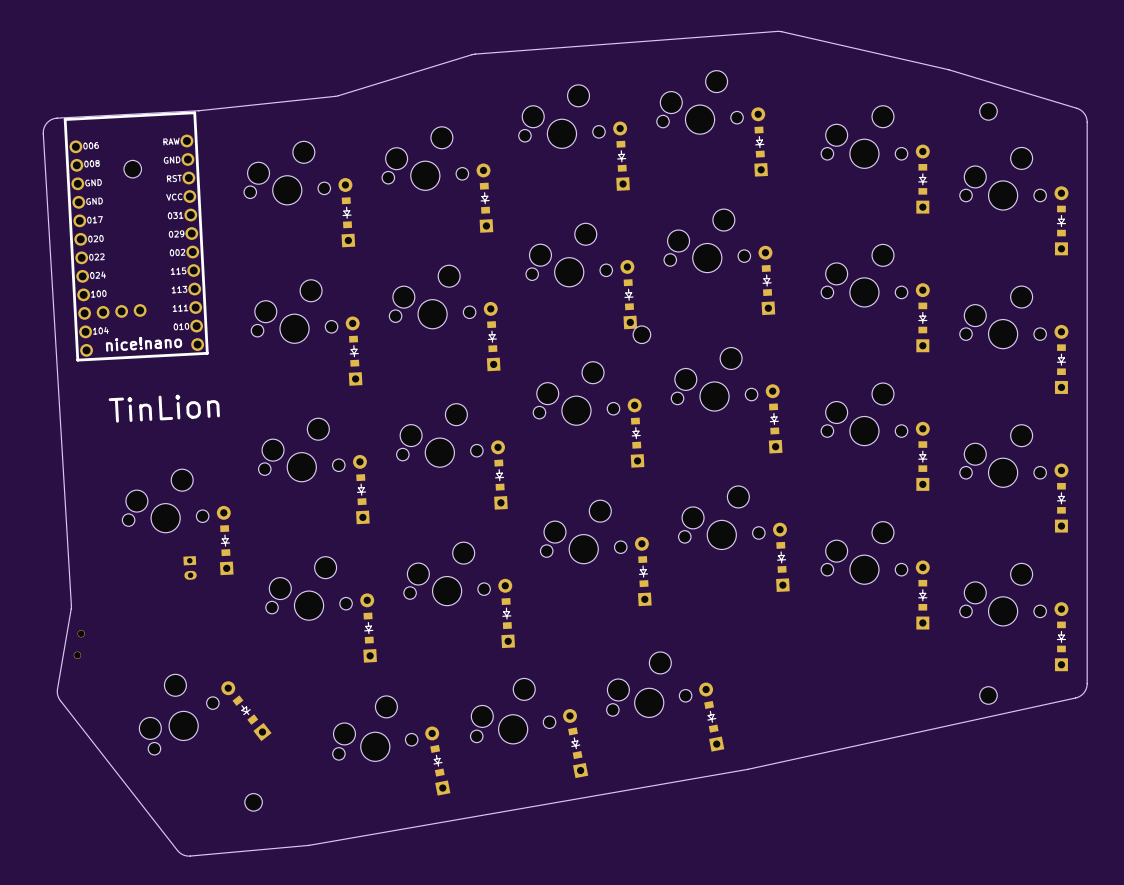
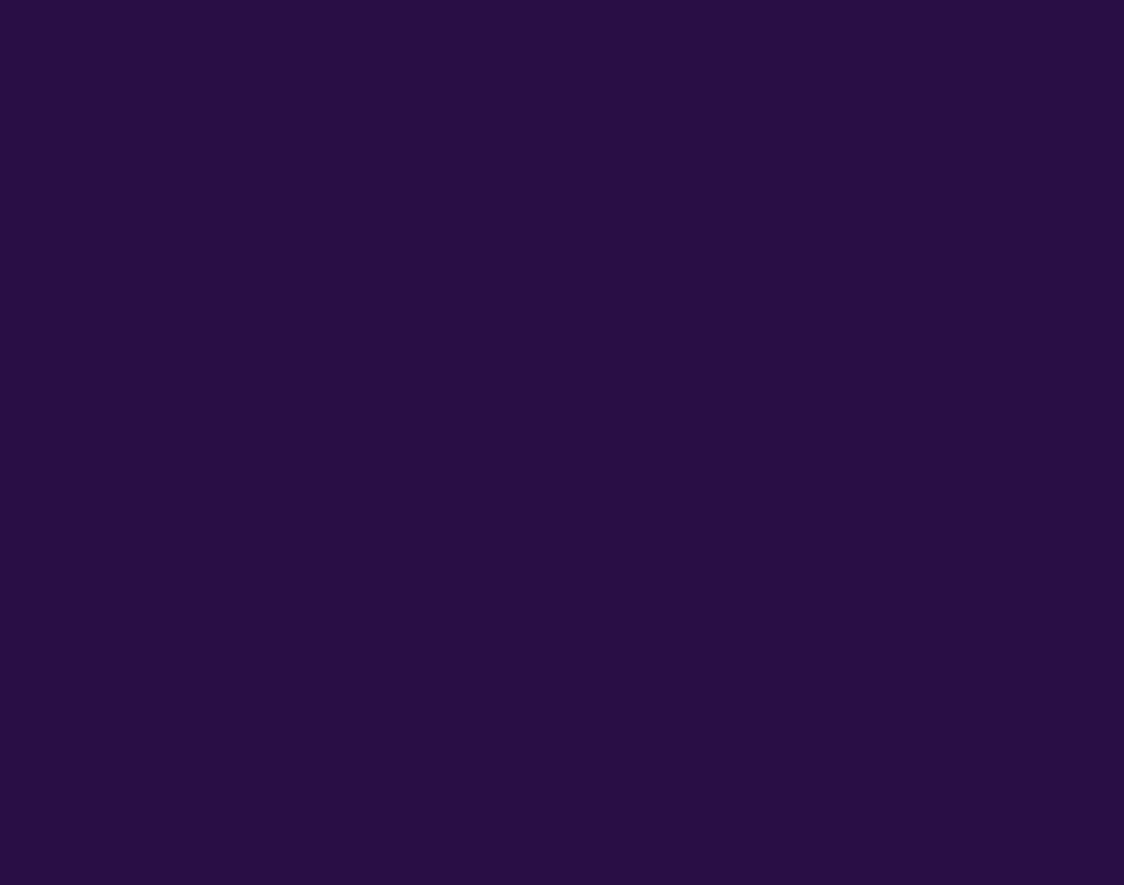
board edge: (777, 31) (475, 54) (336, 96) (198, 110) (57, 118) (45, 124) (43, 133) (71, 605) (57, 693) (60, 700) (180, 853) (190, 856) (308, 845) (747, 769) (1075, 697) (1083, 692) (1087, 683) (1086, 116) (1076, 108) (948, 69) (777, 31) -> none
part: (700, 102) -> none
part: (988, 111) -> none
part: (561, 116) -> none
part: (864, 137) -> none
part: (759, 141) -> none
part: (621, 156) -> none
part: (425, 158) -> none
part: (132, 169) -> none
part: (287, 173) -> none
part: (1003, 178) -> none
part: (922, 179) -> none
part: (484, 198) -> none
part: (346, 212) -> none
part: (1061, 220) -> none
part: (136, 236) -> none
part: (707, 240) -> none
part: (569, 255) -> none
part: (864, 275) -> none
part: (766, 280) -> none
part: (628, 294) -> none
part: (432, 297) -> none
part: (294, 311) -> none
part: (922, 317) -> none
part: (1003, 317) -> none
part: (641, 334) -> none
part: (492, 336) -> none
part: (354, 351) -> none
part: (1061, 359) -> none
part: (714, 379) -> none
part: (576, 393) -> none
text: TinLion (164, 408) -> none
part: (864, 414) -> none
part: (774, 418) -> none
part: (636, 433) -> none
part: (439, 435) -> none
part: (301, 450) -> none
part: (922, 456) -> none
part: (1003, 456) -> none
part: (499, 475) -> none
part: (361, 489) -> none
part: (1061, 498) -> none
part: (165, 500) -> none
part: (721, 517) -> none
part: (583, 531) -> none
part: (225, 540) -> none
part: (864, 552) -> none
part: (781, 557) -> none
part: (190, 567) -> none
part: (643, 571) -> none
part: (447, 573) -> none
part: (309, 588) -> none
part: (922, 594) -> none
part: (1003, 594) -> none
part: (506, 613) -> none
part: (368, 628) -> none
part: (1061, 636) -> none
part: (79, 644) -> none
part: (649, 684) -> none
part: (988, 695) -> none
part: (246, 711) -> none
part: (513, 711) -> none
part: (179, 714) -> none
part: (711, 717) -> none
part: (375, 728) -> none
part: (575, 743) -> none
part: (437, 761) -> none
part: (253, 802) -> none

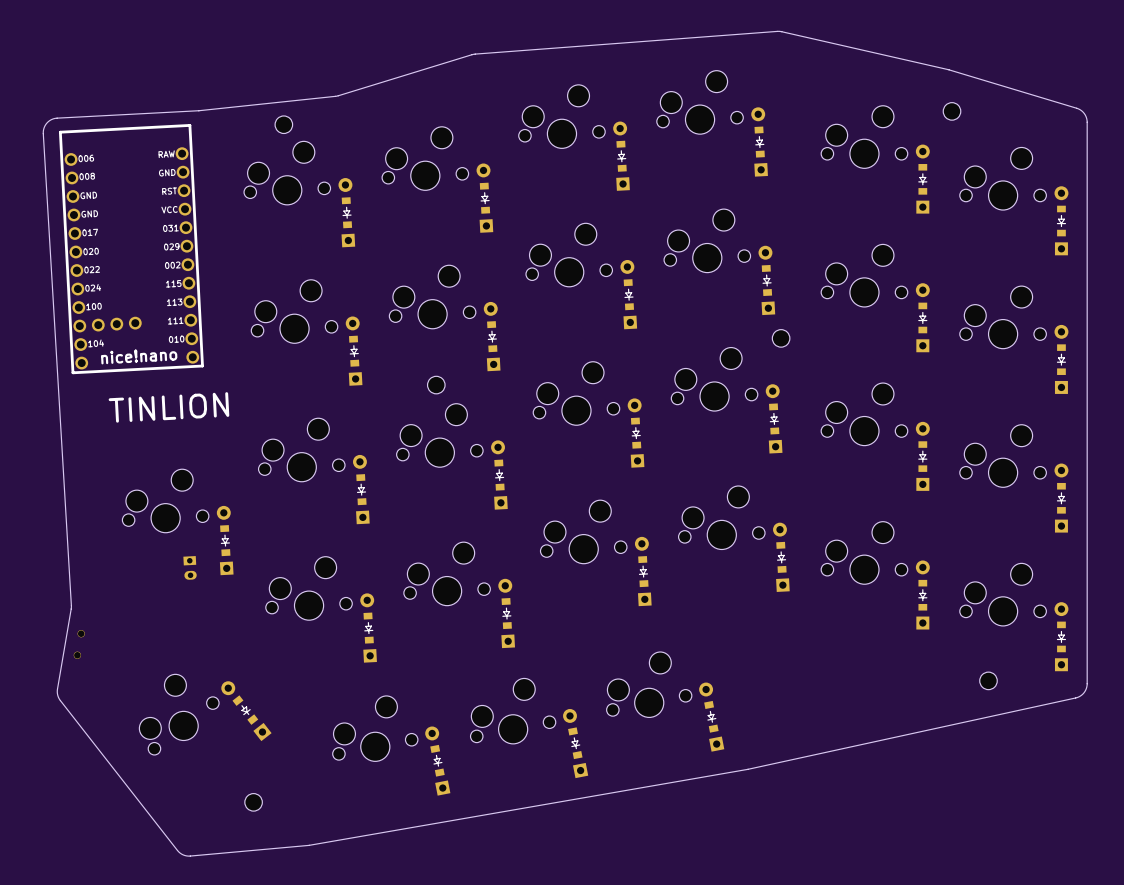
board edge: none -> (777, 31) (475, 54) (336, 96) (198, 110) (57, 118) (45, 124) (43, 133) (71, 605) (57, 693) (60, 700) (180, 853) (190, 856) (308, 845) (747, 769) (1075, 697) (1083, 692) (1087, 683) (1086, 116) (1076, 108) (948, 69) (777, 31)
part: none -> (700, 102)
part: none -> (952, 111)
part: none -> (561, 116)
part: none -> (283, 124)
part: none -> (864, 137)
part: none -> (759, 141)
part: none -> (621, 156)
part: none -> (425, 158)
part: none -> (287, 173)
part: none -> (1003, 178)
part: none -> (922, 179)
part: none -> (484, 198)
part: none -> (346, 212)
part: none -> (1061, 220)
part: none -> (707, 240)
part: none -> (131, 249)
part: none -> (569, 255)
part: none -> (864, 275)
part: none -> (766, 280)
part: none -> (628, 294)
part: none -> (432, 297)
part: none -> (294, 311)
part: none -> (922, 317)
part: none -> (1003, 317)
part: none -> (492, 336)
part: none -> (781, 338)
part: none -> (354, 351)
part: none -> (1061, 359)
part: none -> (714, 379)
part: none -> (436, 385)
part: none -> (576, 393)
text: none -> TINLION (168, 407)
part: none -> (864, 414)
part: none -> (774, 418)
part: none -> (636, 433)
part: none -> (439, 435)
part: none -> (301, 450)
part: none -> (922, 456)
part: none -> (1003, 456)
part: none -> (499, 475)
part: none -> (361, 489)
part: none -> (1061, 498)
part: none -> (165, 500)
part: none -> (721, 517)
part: none -> (583, 531)
part: none -> (225, 540)
part: none -> (864, 552)
part: none -> (781, 557)
part: none -> (190, 567)
part: none -> (643, 571)
part: none -> (447, 573)
part: none -> (309, 588)
part: none -> (922, 594)
part: none -> (1003, 594)
part: none -> (506, 613)
part: none -> (368, 628)
part: none -> (1061, 636)
part: none -> (79, 644)
part: none -> (988, 680)
part: none -> (649, 684)
part: none -> (246, 711)
part: none -> (513, 711)
part: none -> (179, 714)
part: none -> (711, 717)
part: none -> (375, 728)
part: none -> (575, 743)
part: none -> (437, 761)
part: none -> (253, 802)

